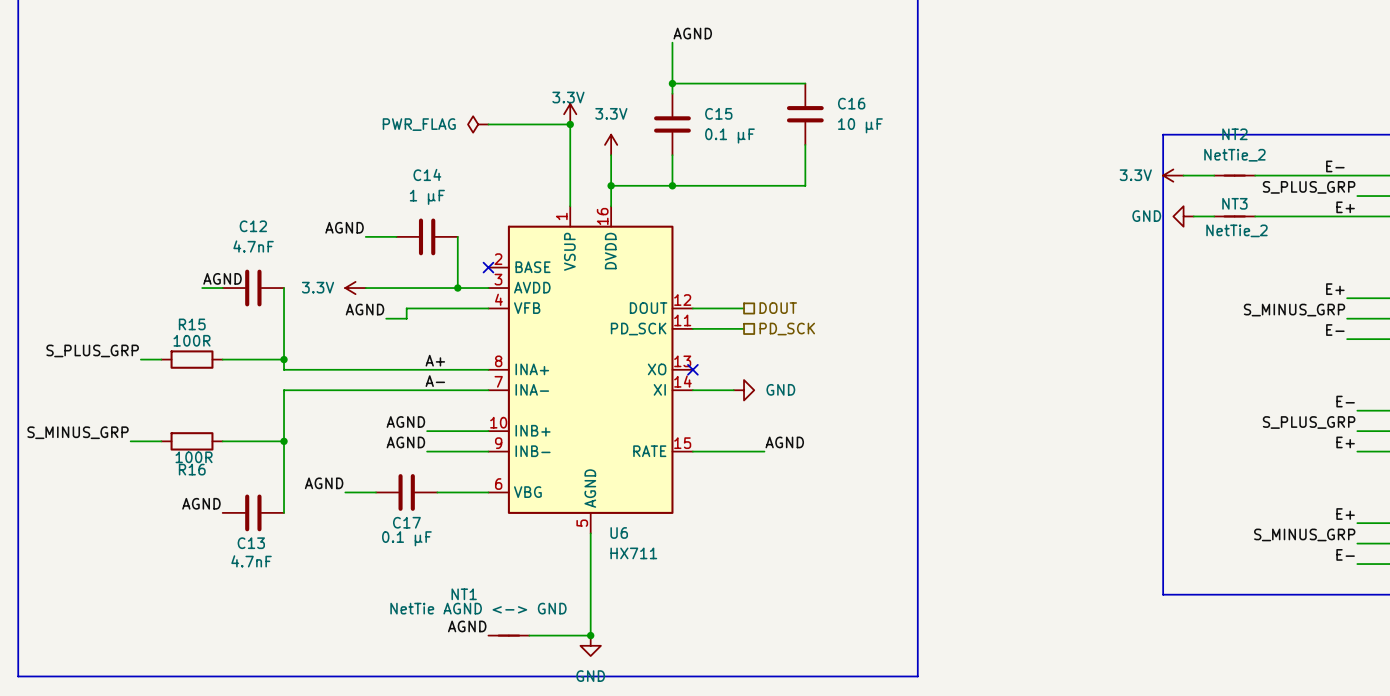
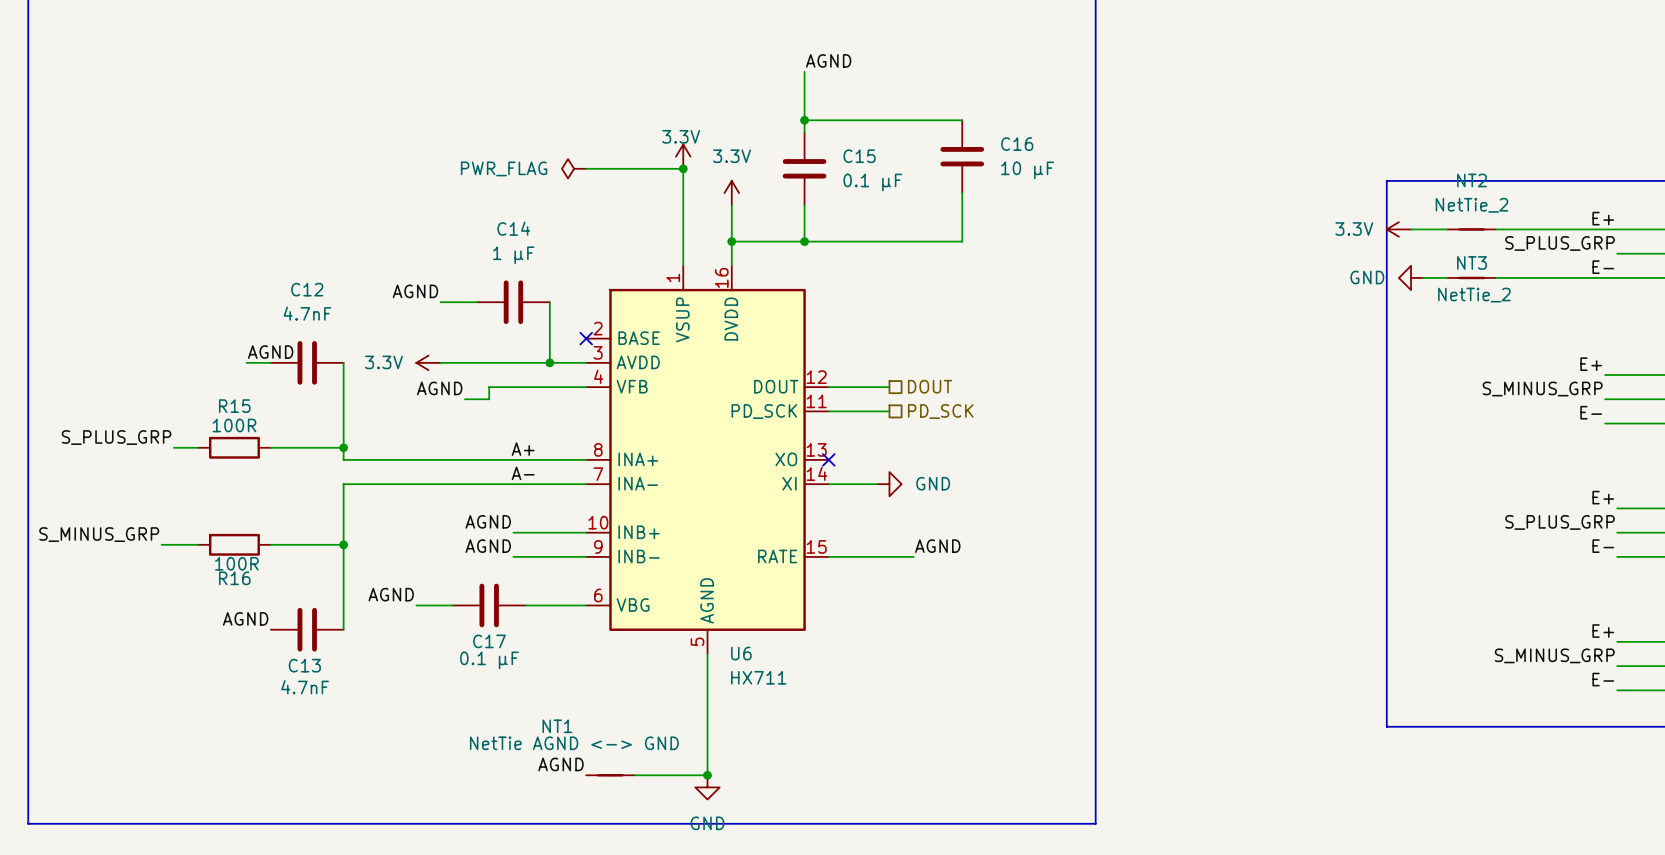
label: E- (1335, 166) -> none
label: none -> E+ (1603, 218)
label: E+ (1345, 207) -> E- (1603, 267)
label: E- (1345, 401) -> E+ (1603, 497)
label: E+ (1345, 442) -> E- (1603, 546)

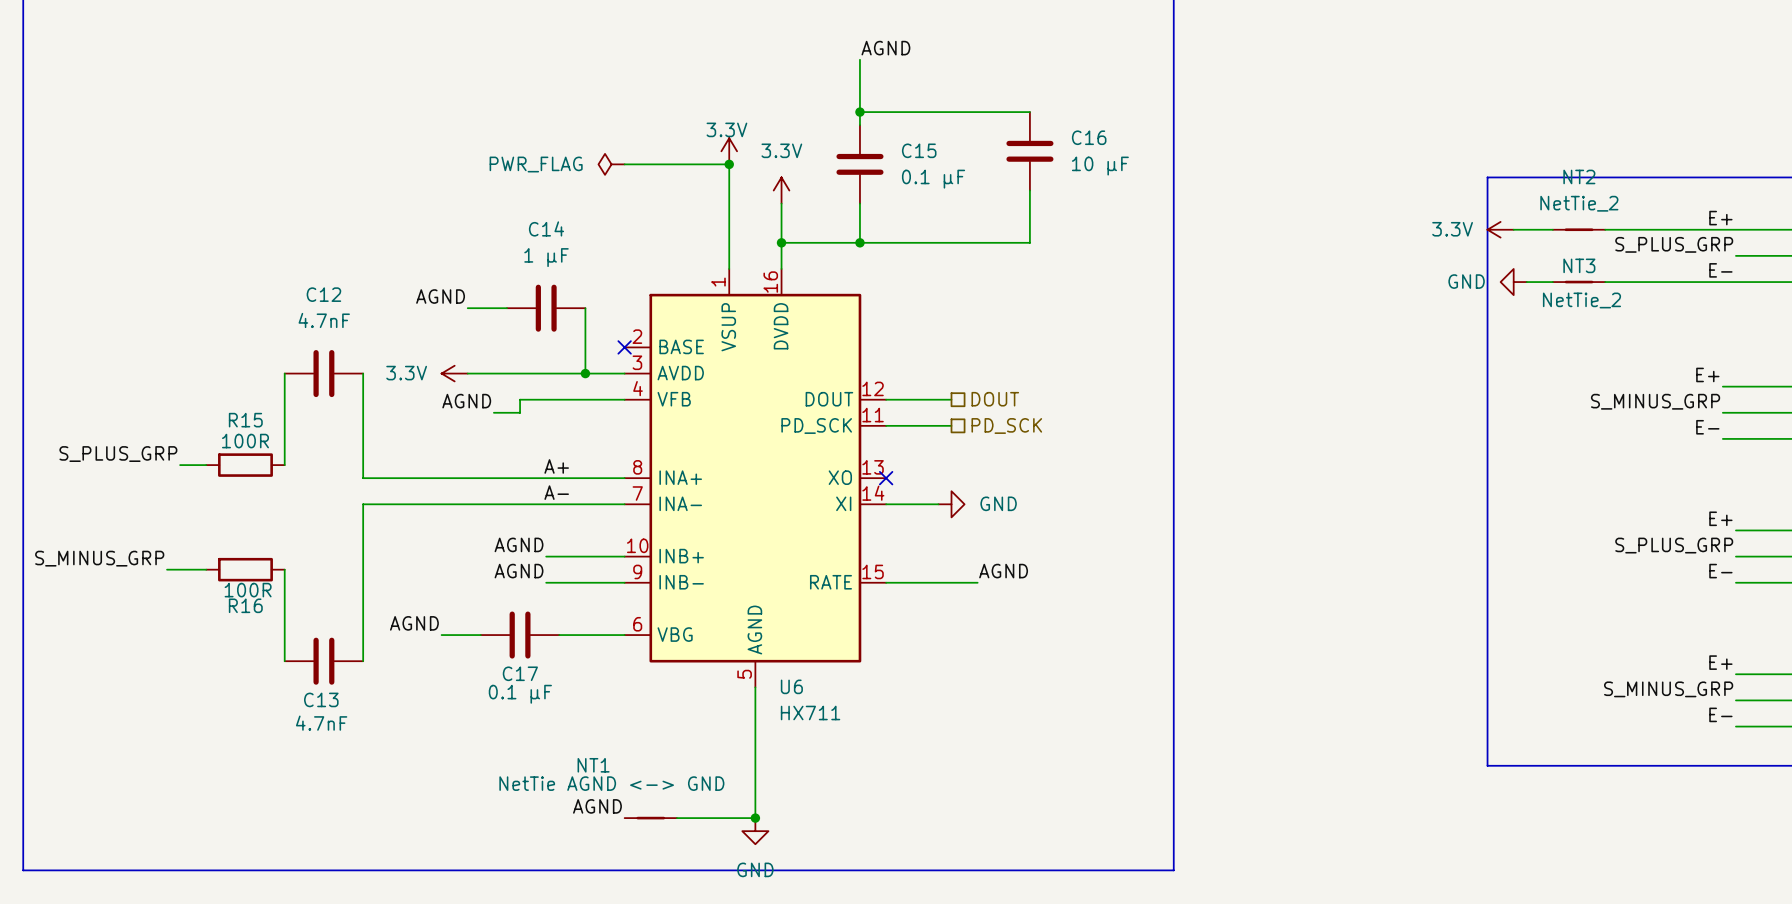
label: AGND (270, 352) -> none
wire: (246, 362) (270, 362) -> (284, 465) (284, 373)
wire: (270, 447) (343, 447) -> none
junction: (343, 447) -> none
wire: (270, 544) (343, 544) -> (284, 569) (284, 661)
junction: (343, 544) -> none
label: AGND (245, 618) -> none

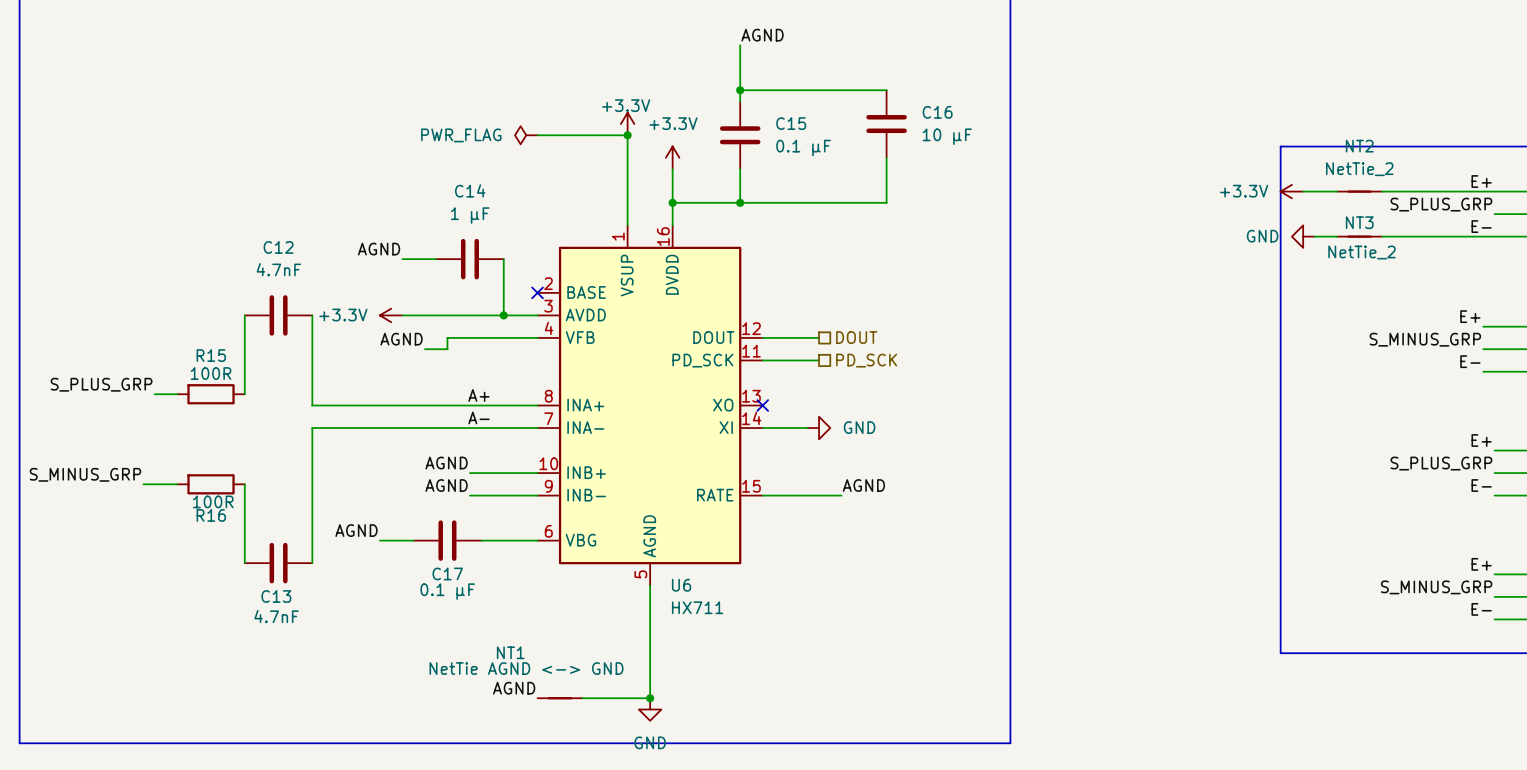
power symbol: 3.3V (729, 151) -> +3.3V (627, 124)
power symbol: 3.3V (781, 190) -> +3.3V (672, 157)
power symbol: 3.3V (1500, 229) -> +3.3V (1291, 191)
power symbol: 3.3V (454, 373) -> +3.3V (391, 315)

